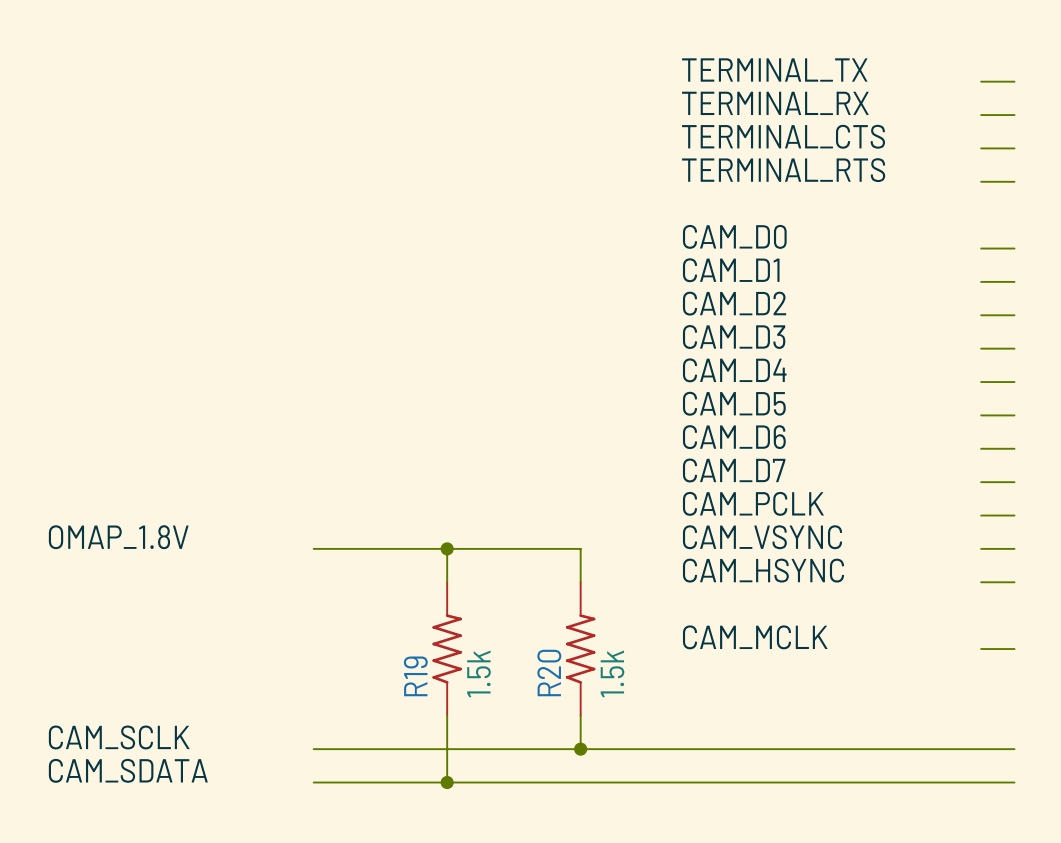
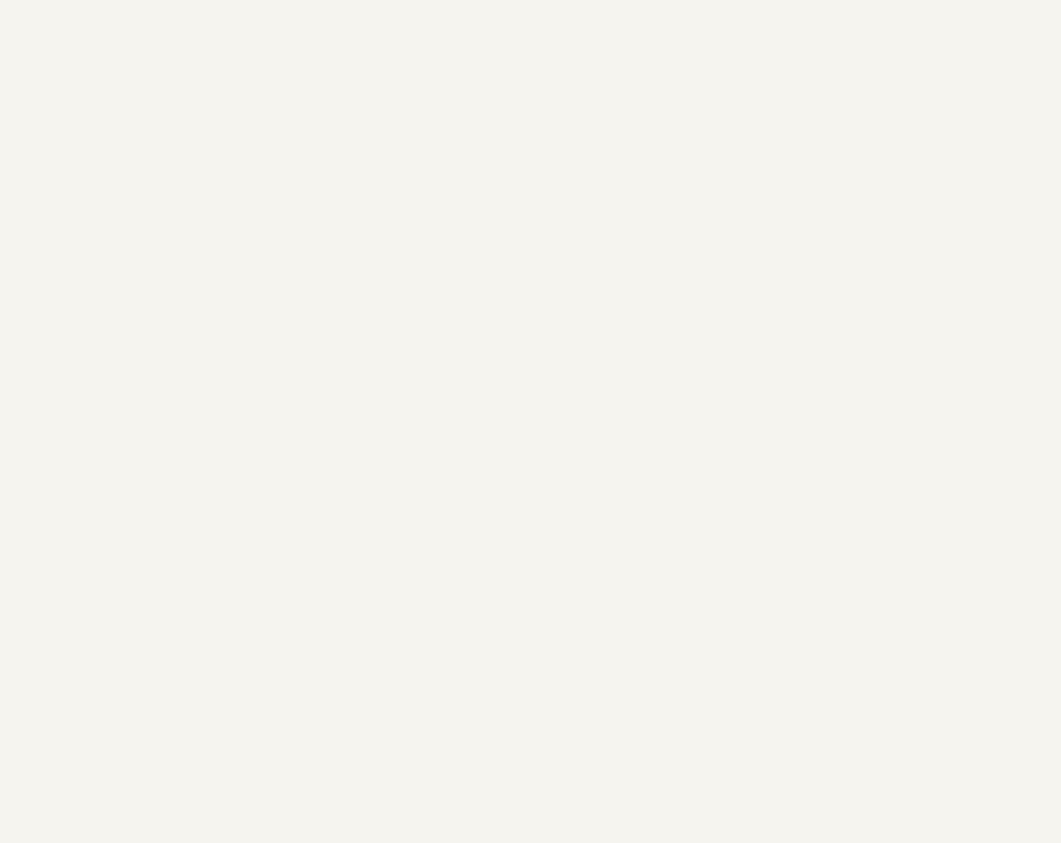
label: TERMINAL_TX (774, 70) -> none
wire: (981, 81) (1014, 81) -> none
label: TERMINAL_RX (775, 103) -> none
wire: (981, 115) (1014, 115) -> none
label: TERMINAL_CTS (783, 136) -> none
wire: (981, 148) (1014, 148) -> none
label: TERMINAL_RTS (783, 170) -> none
wire: (981, 181) (1014, 181) -> none
label: CAM_D0 (734, 236) -> none
wire: (981, 248) (1014, 248) -> none
label: CAM_D1 (731, 270) -> none
wire: (981, 281) (1014, 281) -> none
label: CAM_D2 (734, 303) -> none
wire: (981, 315) (1014, 315) -> none
label: CAM_D3 (734, 337) -> none
wire: (981, 348) (1014, 348) -> none
label: CAM_D4 (734, 370) -> none
wire: (981, 382) (1014, 382) -> none
label: CAM_D5 (734, 403) -> none
wire: (981, 415) (1014, 415) -> none
label: CAM_D6 (734, 437) -> none
wire: (981, 448) (1014, 448) -> none
label: CAM_D7 (734, 470) -> none
wire: (981, 482) (1014, 482) -> none
label: CAM_PCLK (753, 503) -> none
wire: (981, 515) (1014, 515) -> none
label: OMAP_1.8V (118, 537) -> none
label: CAM_VSYNC (762, 537) -> none
wire: (313, 548) (580, 548) (580, 582) -> none
wire: (447, 548) (447, 582) -> none
junction: (447, 548) -> none
wire: (981, 548) (1014, 548) -> none
label: CAM_HSYNC (763, 570) -> none
wire: (981, 582) (1014, 582) -> none
label: CAM_MCLK (755, 637) -> none
R19: 1.5k (447, 649) -> none
R20: 1.5k (580, 649) -> none
wire: (981, 649) (1014, 649) -> none
wire: (447, 715) (447, 782) -> none
wire: (580, 715) (580, 749) -> none
label: CAM_SCLK (119, 737) -> none
wire: (313, 749) (1014, 749) -> none
junction: (580, 749) -> none
label: CAM_SDATA (128, 770) -> none
wire: (313, 782) (1014, 782) -> none
junction: (447, 782) -> none

